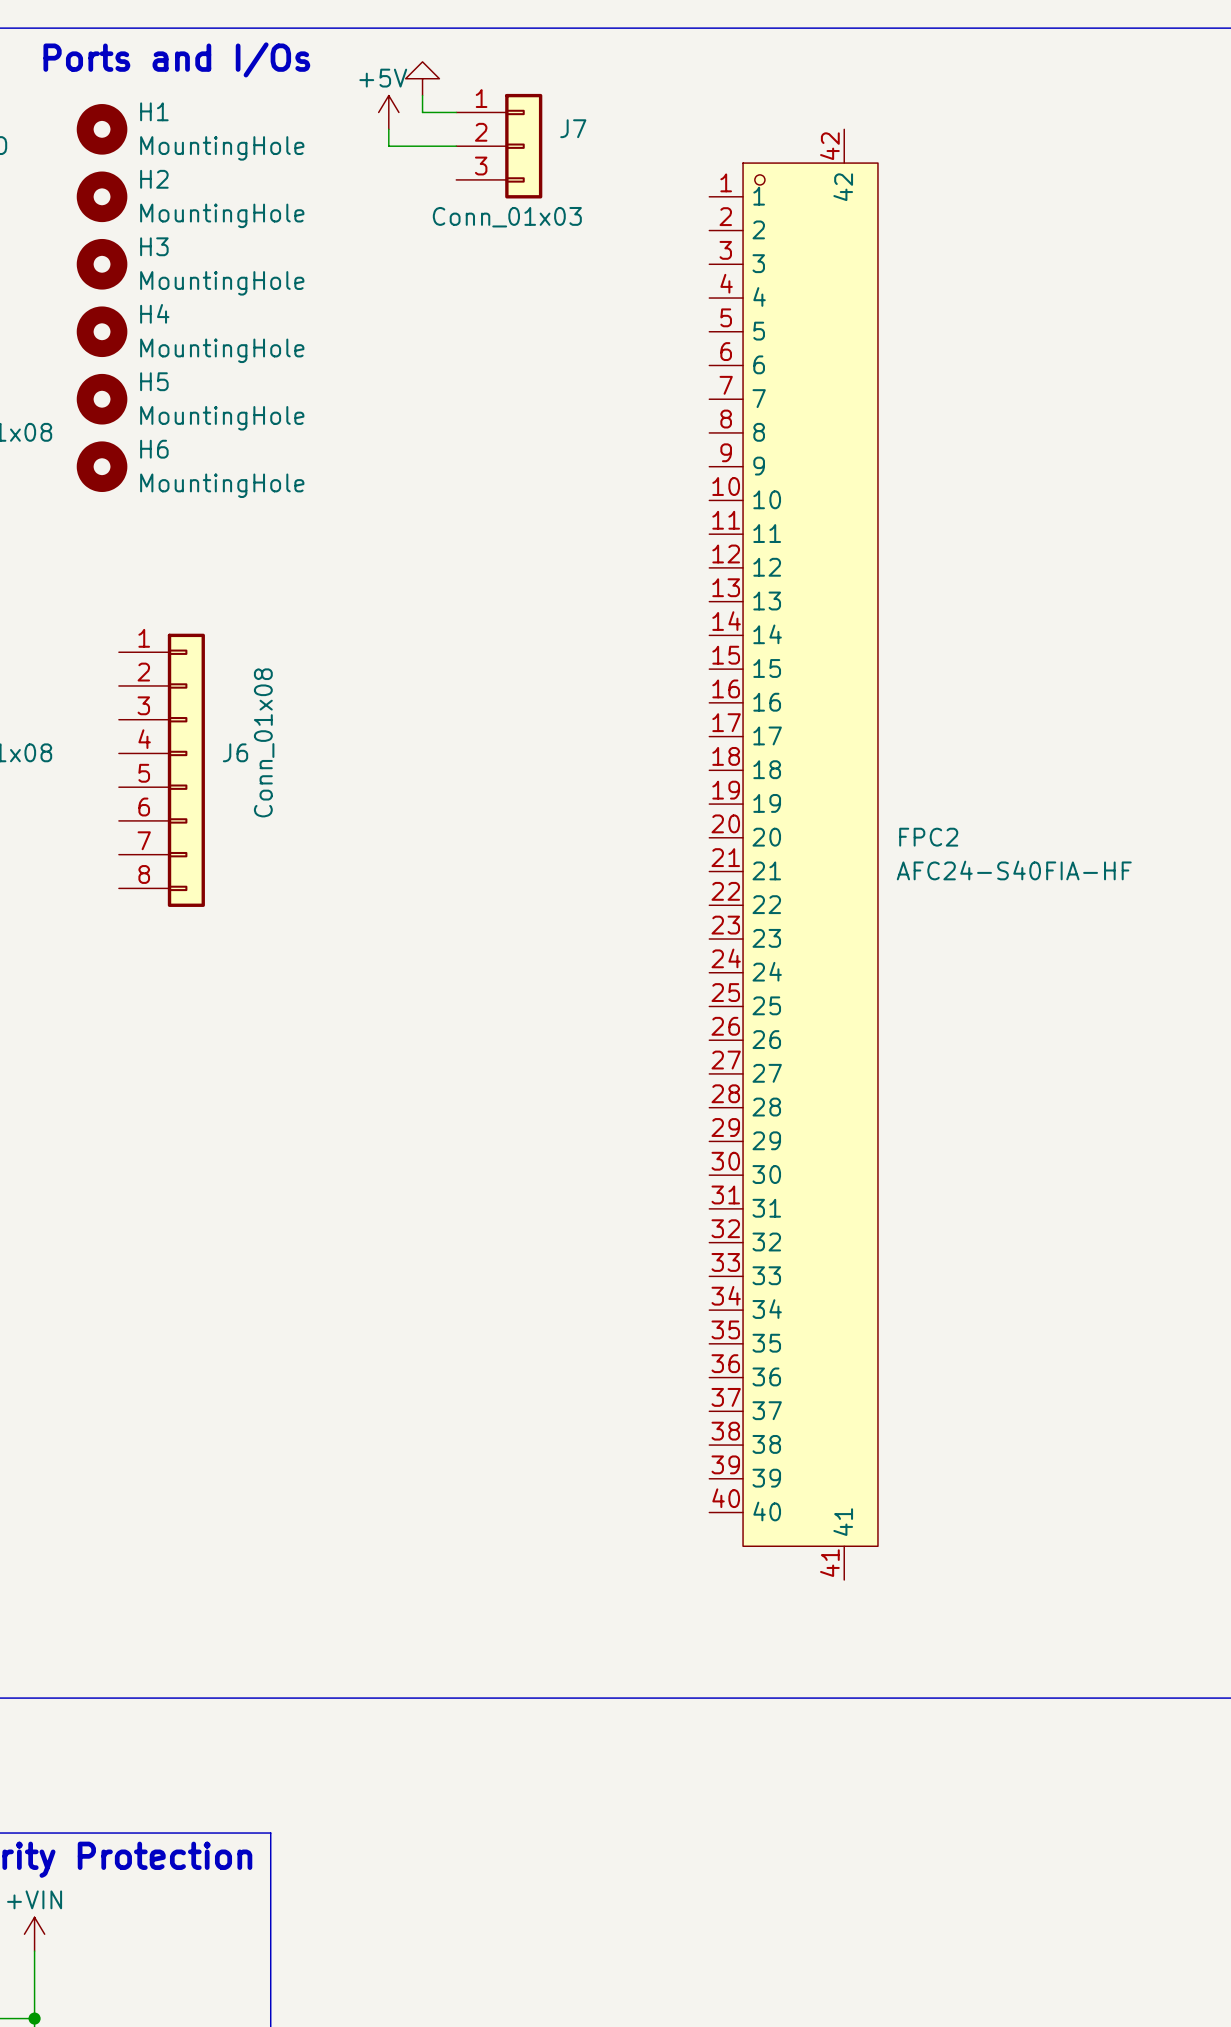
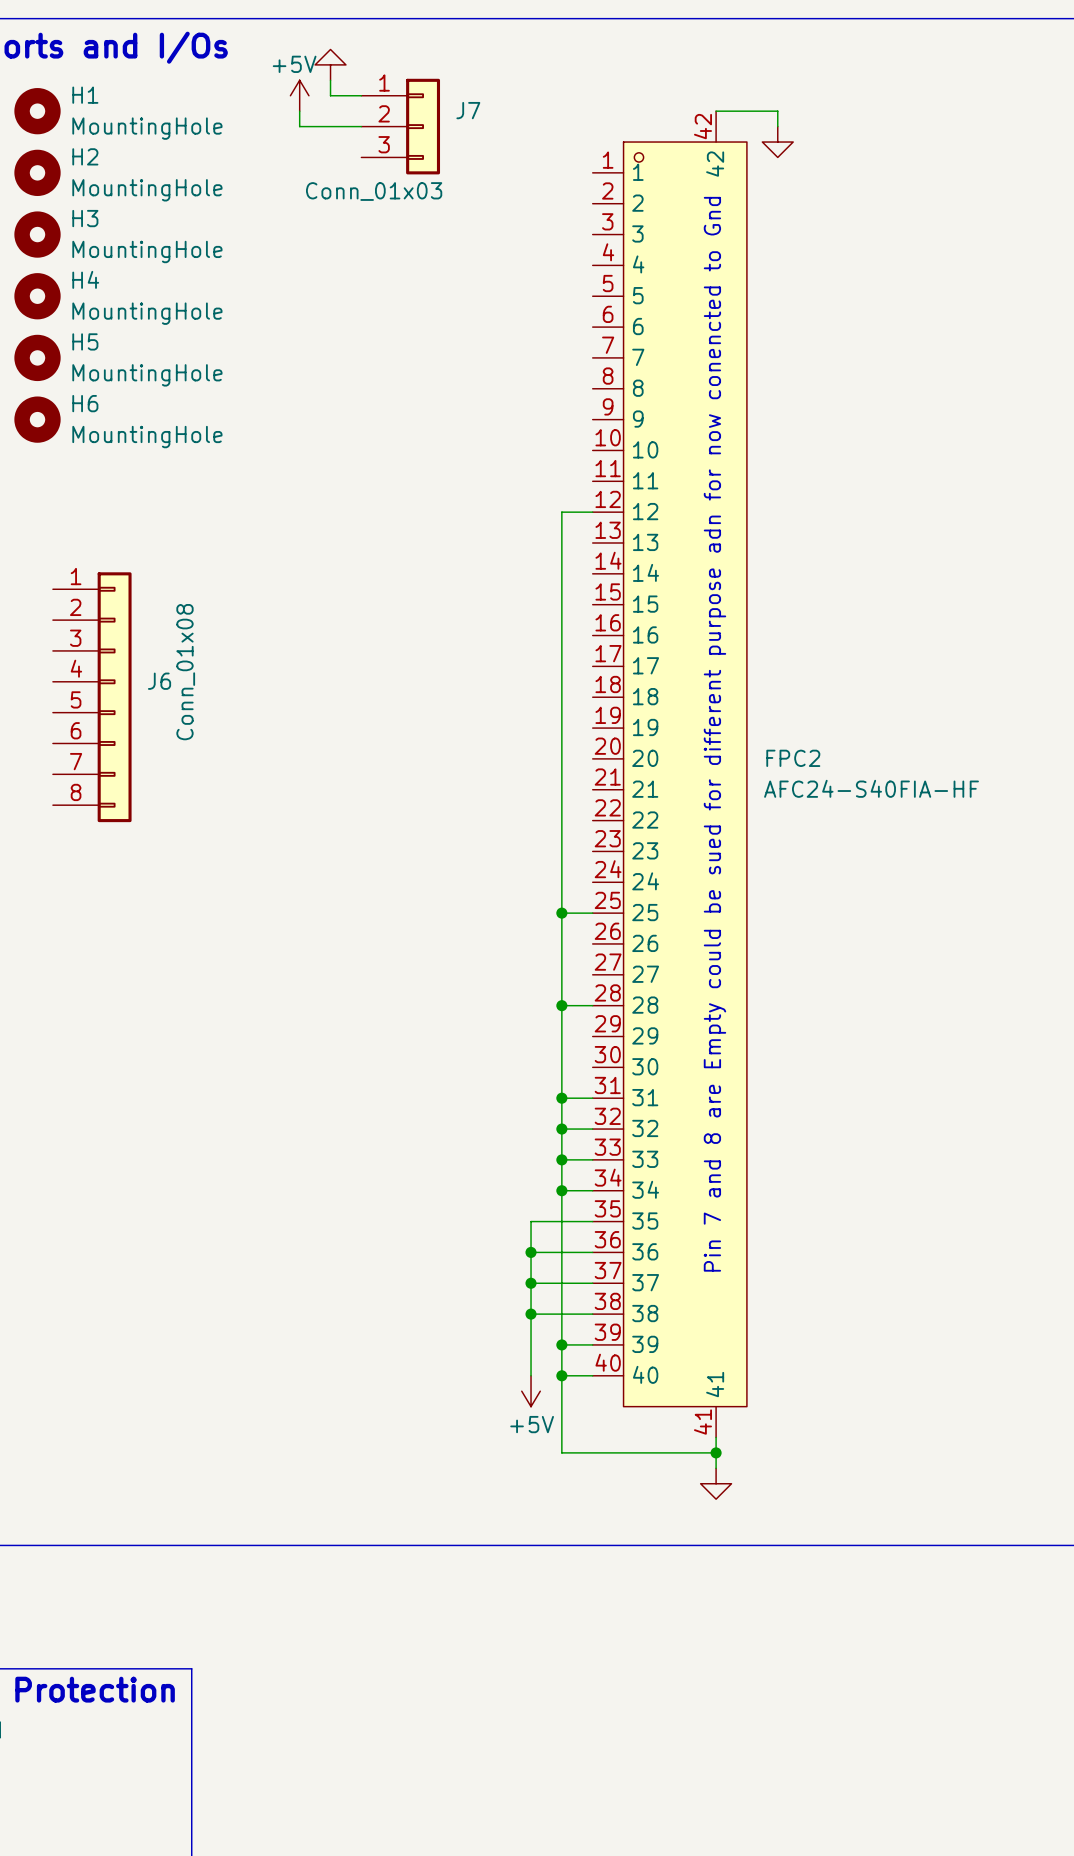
wire: none -> (716, 111) (777, 111) (777, 126)
power symbol: none -> (777, 142)
J7 value position: Conn_01x03 (507, 217) -> Conn_01x03 (374, 191)
wire: none -> (592, 512) (561, 512) (561, 1452) (716, 1452)
text: none -> Pin 7 and 8 are Empty could be sued for different purpose adn for now conencted to Gnd (714, 734)
wire: none -> (561, 913) (592, 913)
junction: none -> (561, 913)
wire: none -> (561, 1005) (592, 1005)
junction: none -> (561, 1005)
wire: none -> (561, 1098) (592, 1098)
junction: none -> (561, 1098)
wire: none -> (561, 1129) (592, 1129)
junction: none -> (561, 1129)
wire: none -> (561, 1159) (592, 1159)
junction: none -> (561, 1159)
wire: none -> (561, 1190) (592, 1190)
junction: none -> (561, 1190)
wire: none -> (592, 1221) (531, 1221) (531, 1375)
wire: none -> (531, 1252) (592, 1252)
junction: none -> (531, 1252)
wire: none -> (531, 1283) (592, 1283)
junction: none -> (531, 1283)
wire: none -> (531, 1314) (592, 1314)
junction: none -> (531, 1314)
wire: none -> (561, 1344) (592, 1344)
junction: none -> (561, 1344)
wire: none -> (561, 1375) (592, 1375)
junction: none -> (561, 1375)
power symbol: none -> +5V (531, 1391)
wire: none -> (716, 1437) (716, 1468)
junction: none -> (716, 1452)
power symbol: none -> (716, 1483)

